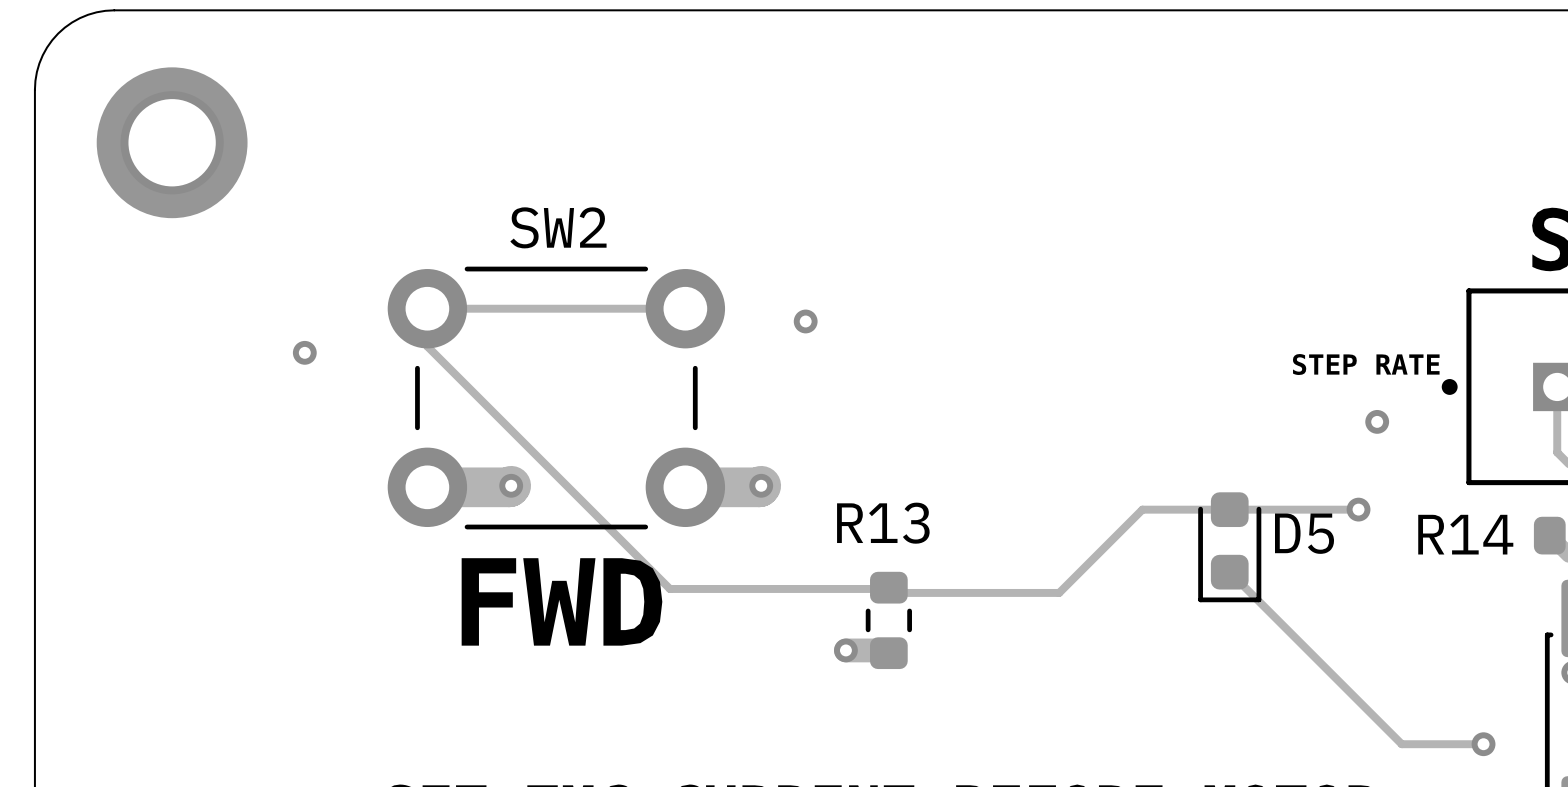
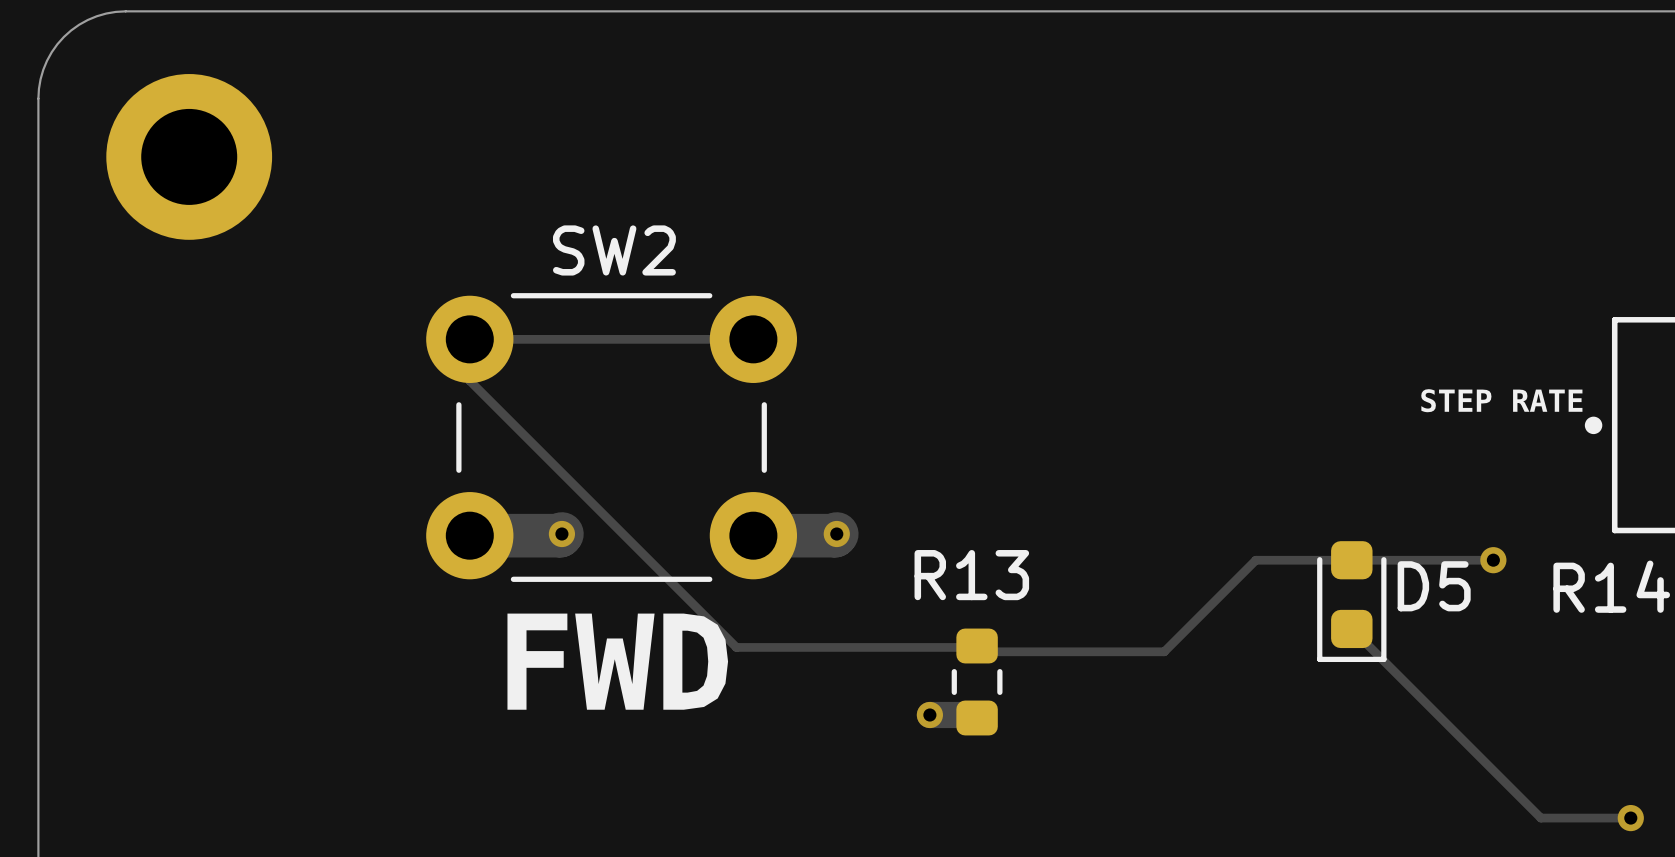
via: (805, 321) -> none
via: (304, 352) -> none
via: (1377, 421) -> none

